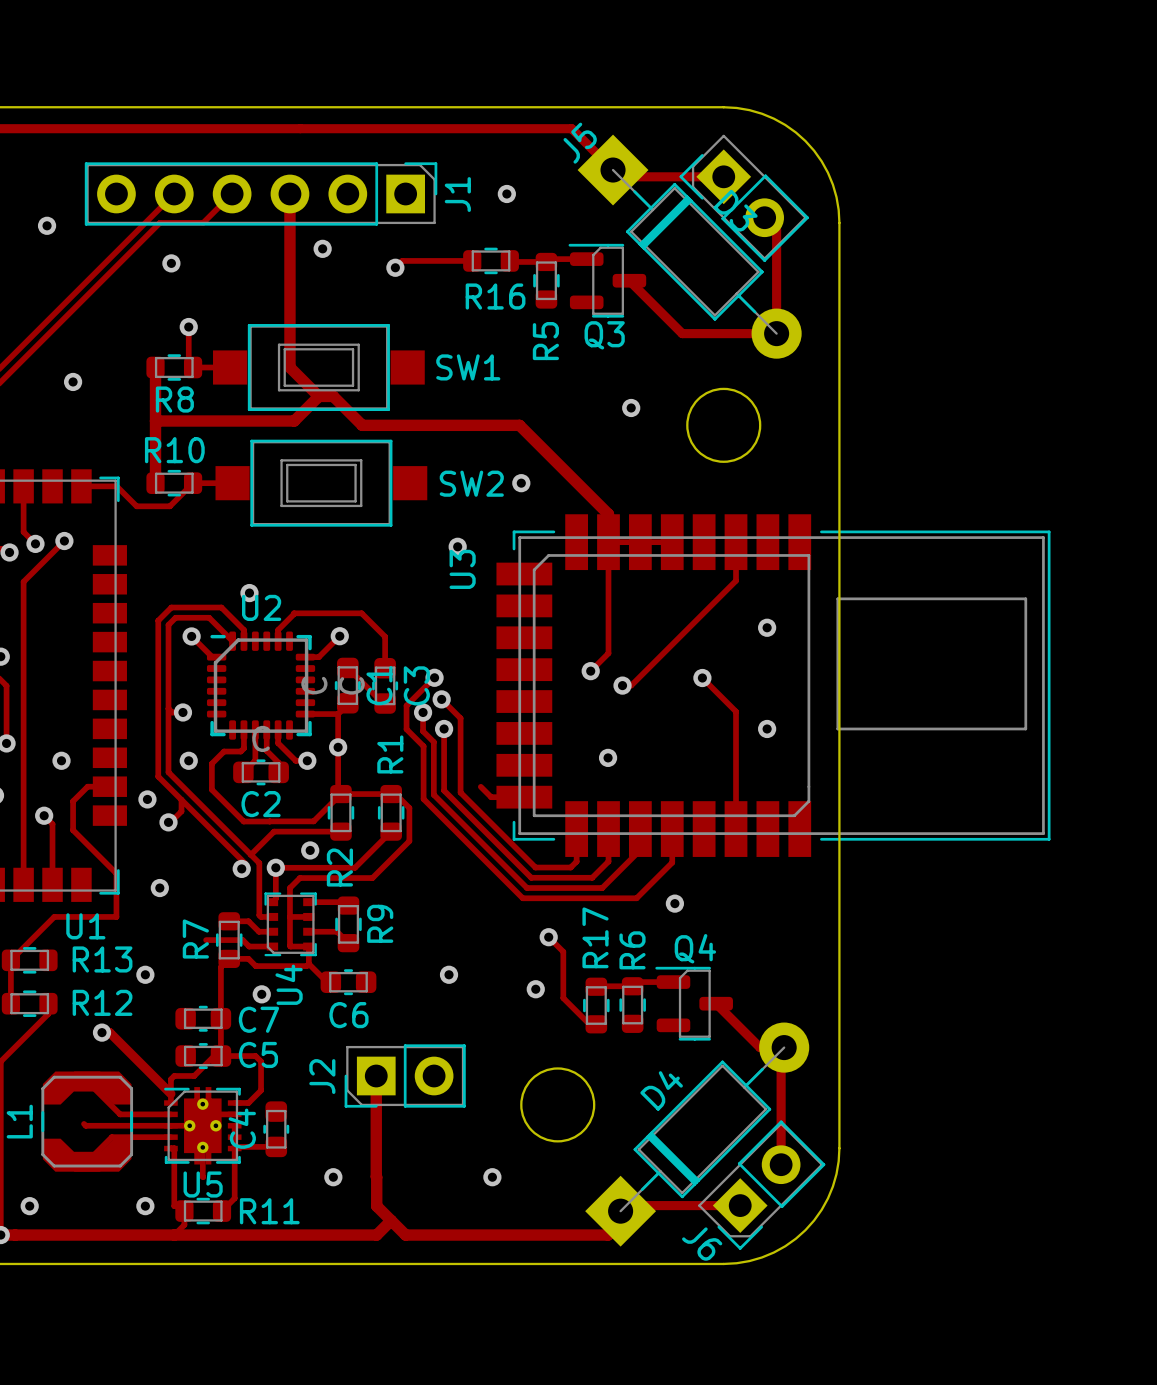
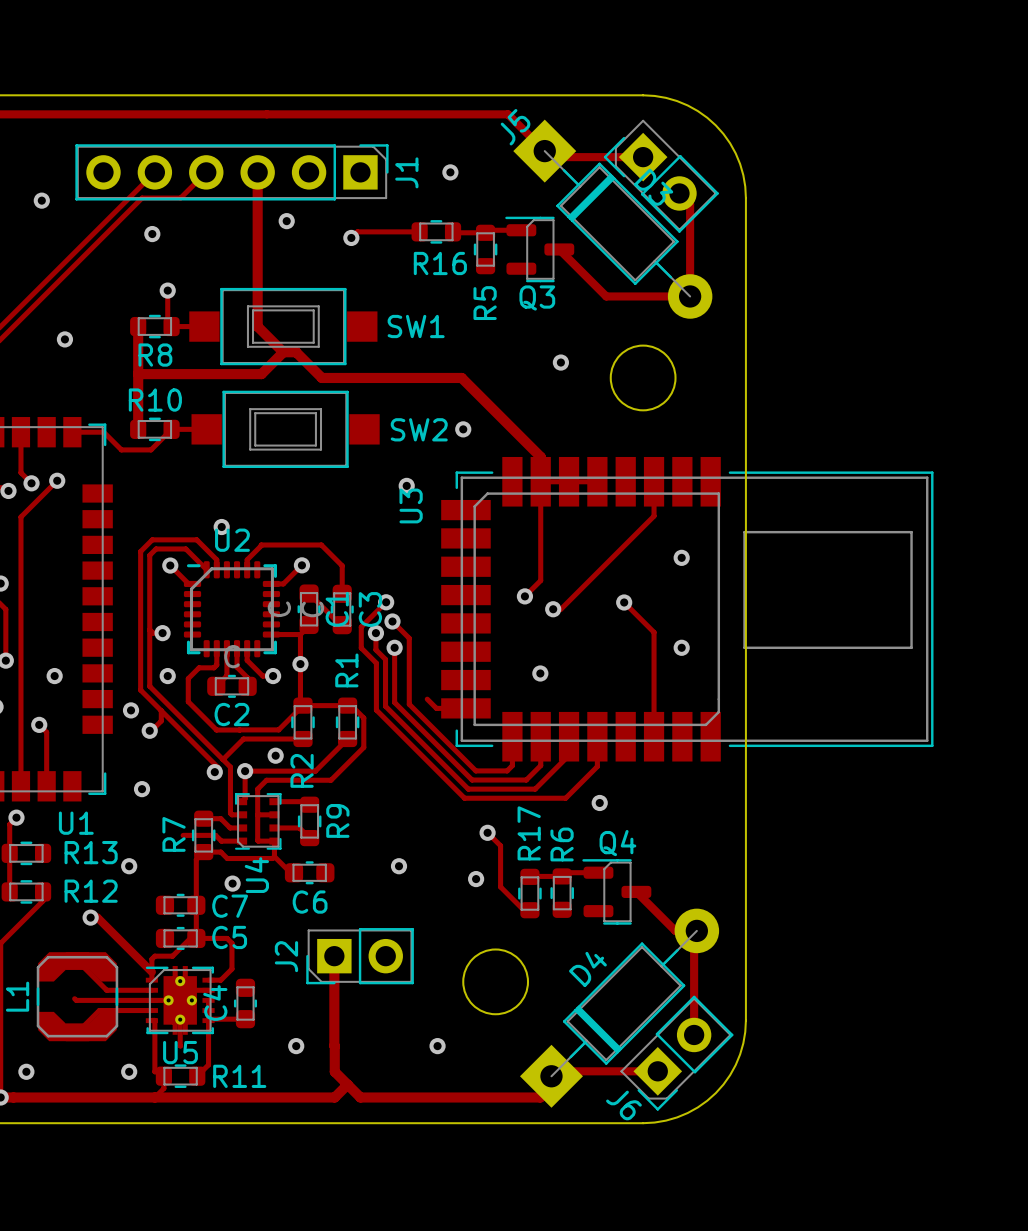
track: (109, 786) (87, 786) (73, 801) (73, 830) (116, 873) (116, 916) (54, 916) (10, 960) -> (16, 817) (9, 824) (9, 853)
via: none -> (16, 817)

